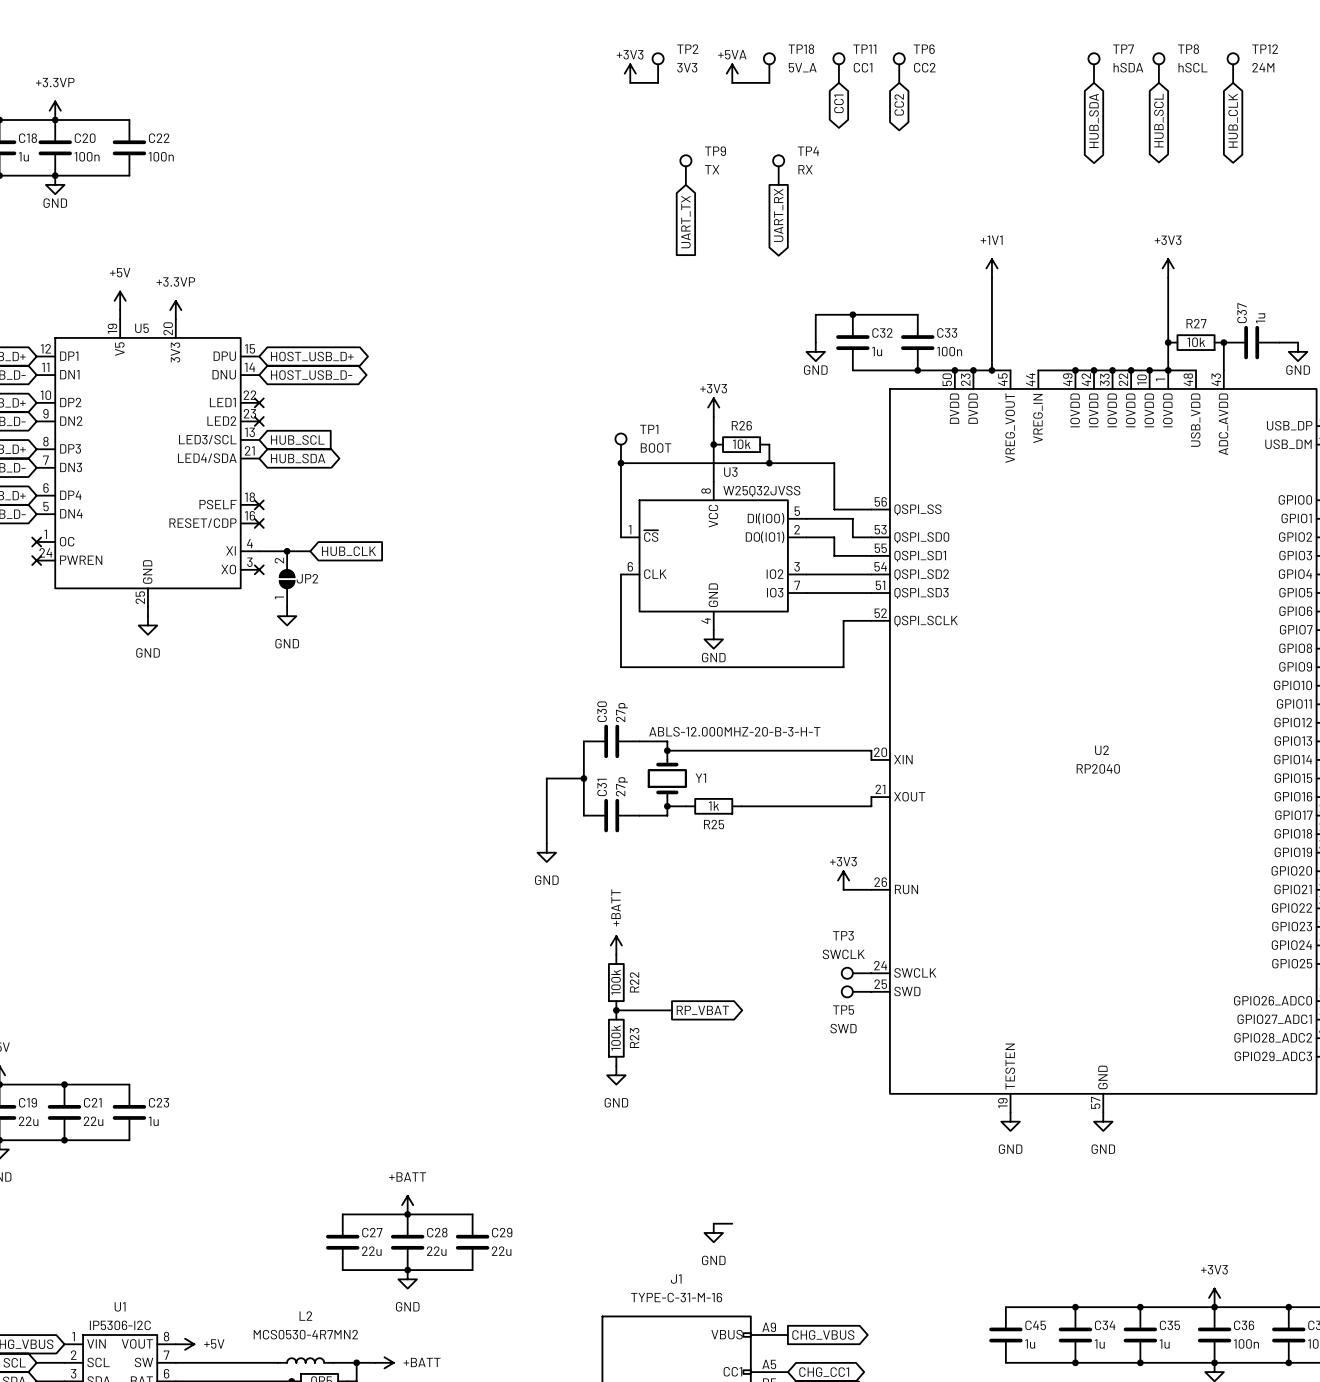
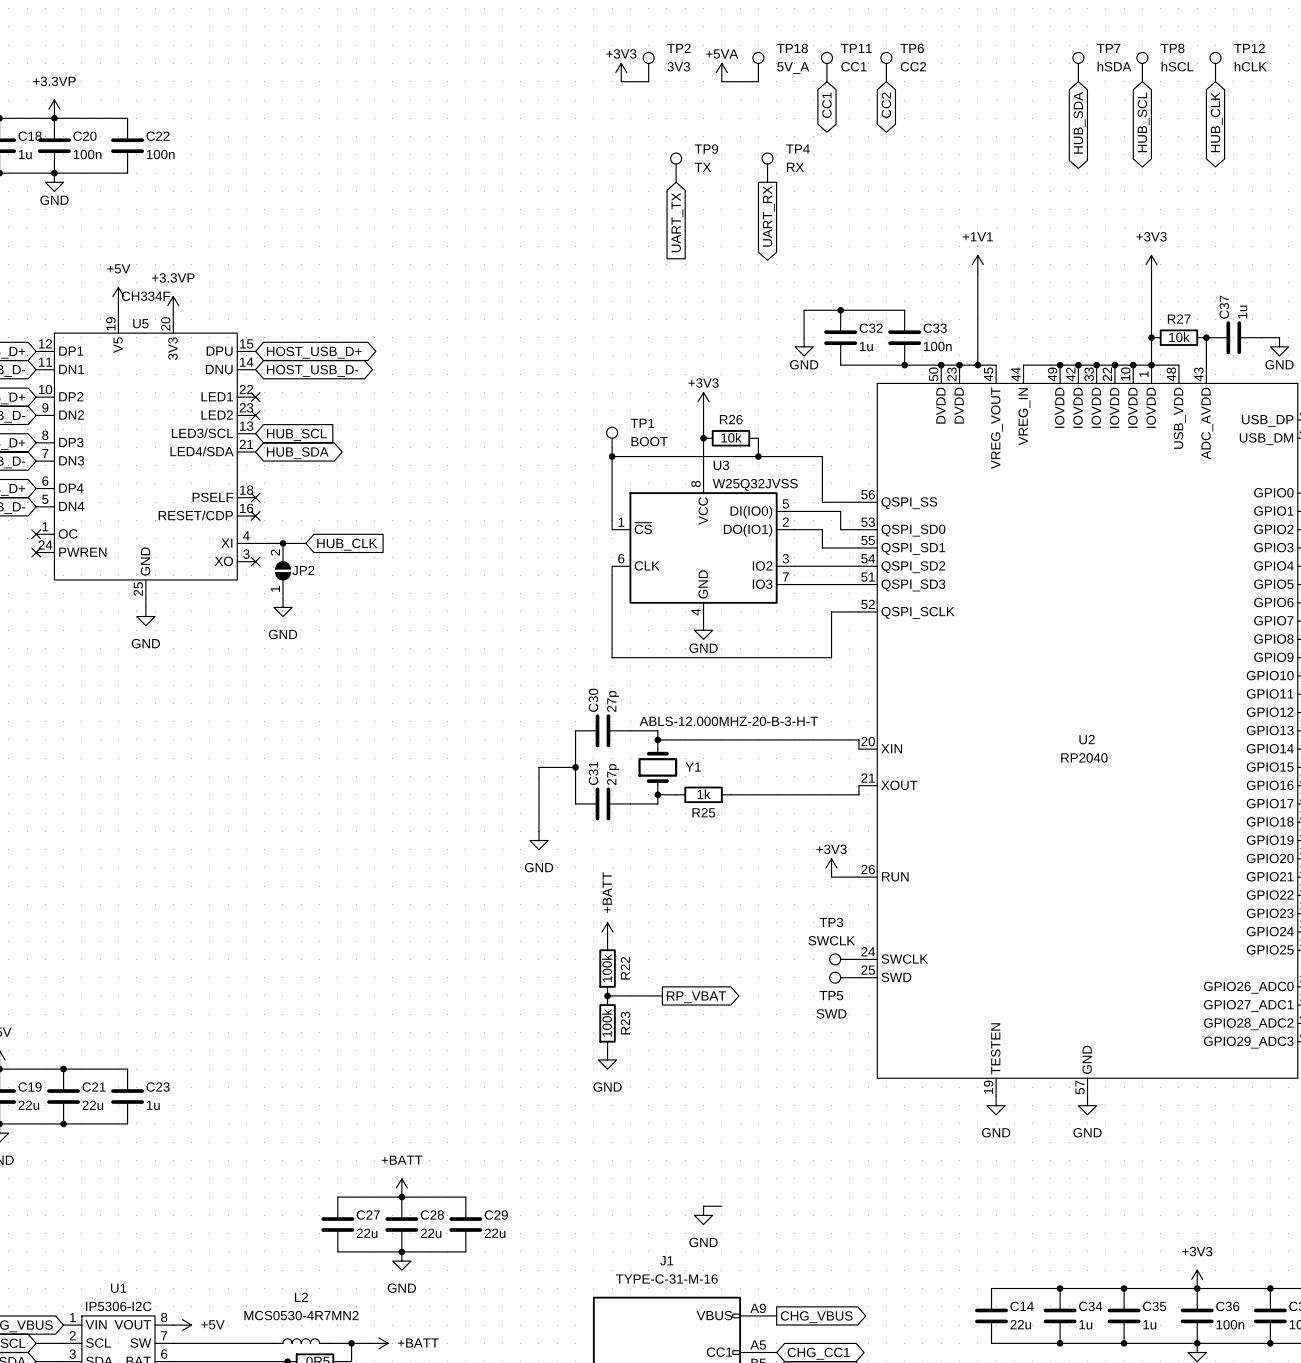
TP12 value: 24M (1263, 67) -> hCLK (1250, 66)
U5 value: none -> CH334F (145, 296)
C45 name: C45 (1035, 1325) -> C14 (1022, 1306)
C45 value: 1u (1030, 1343) -> 22u (1020, 1324)

